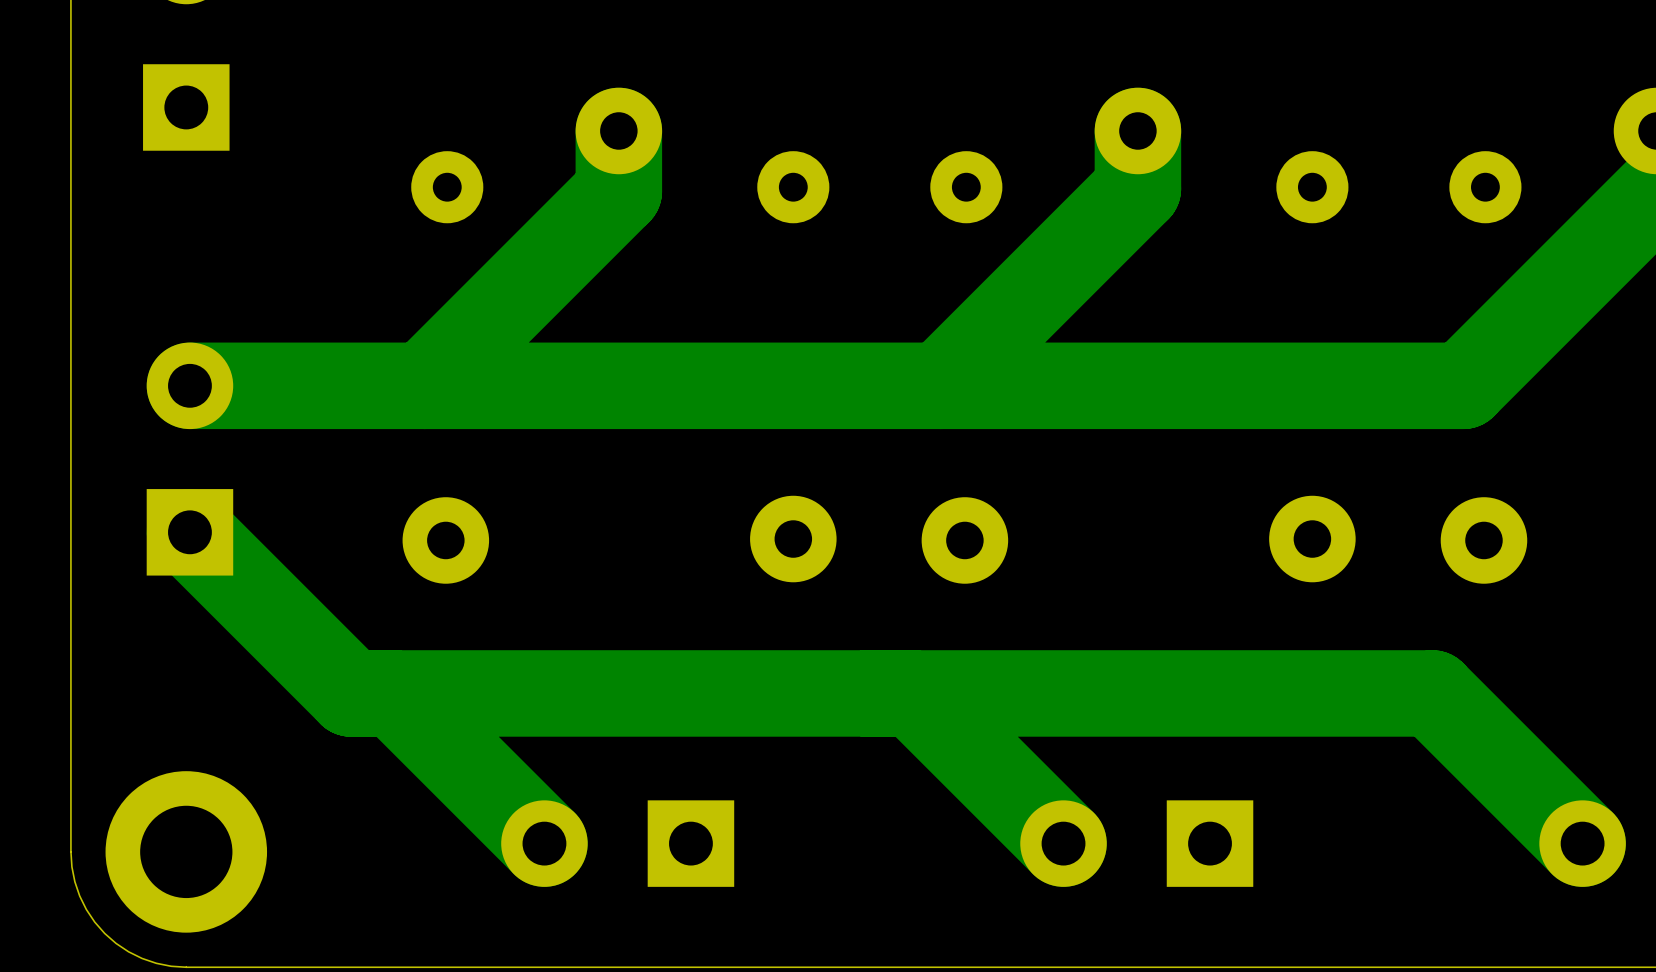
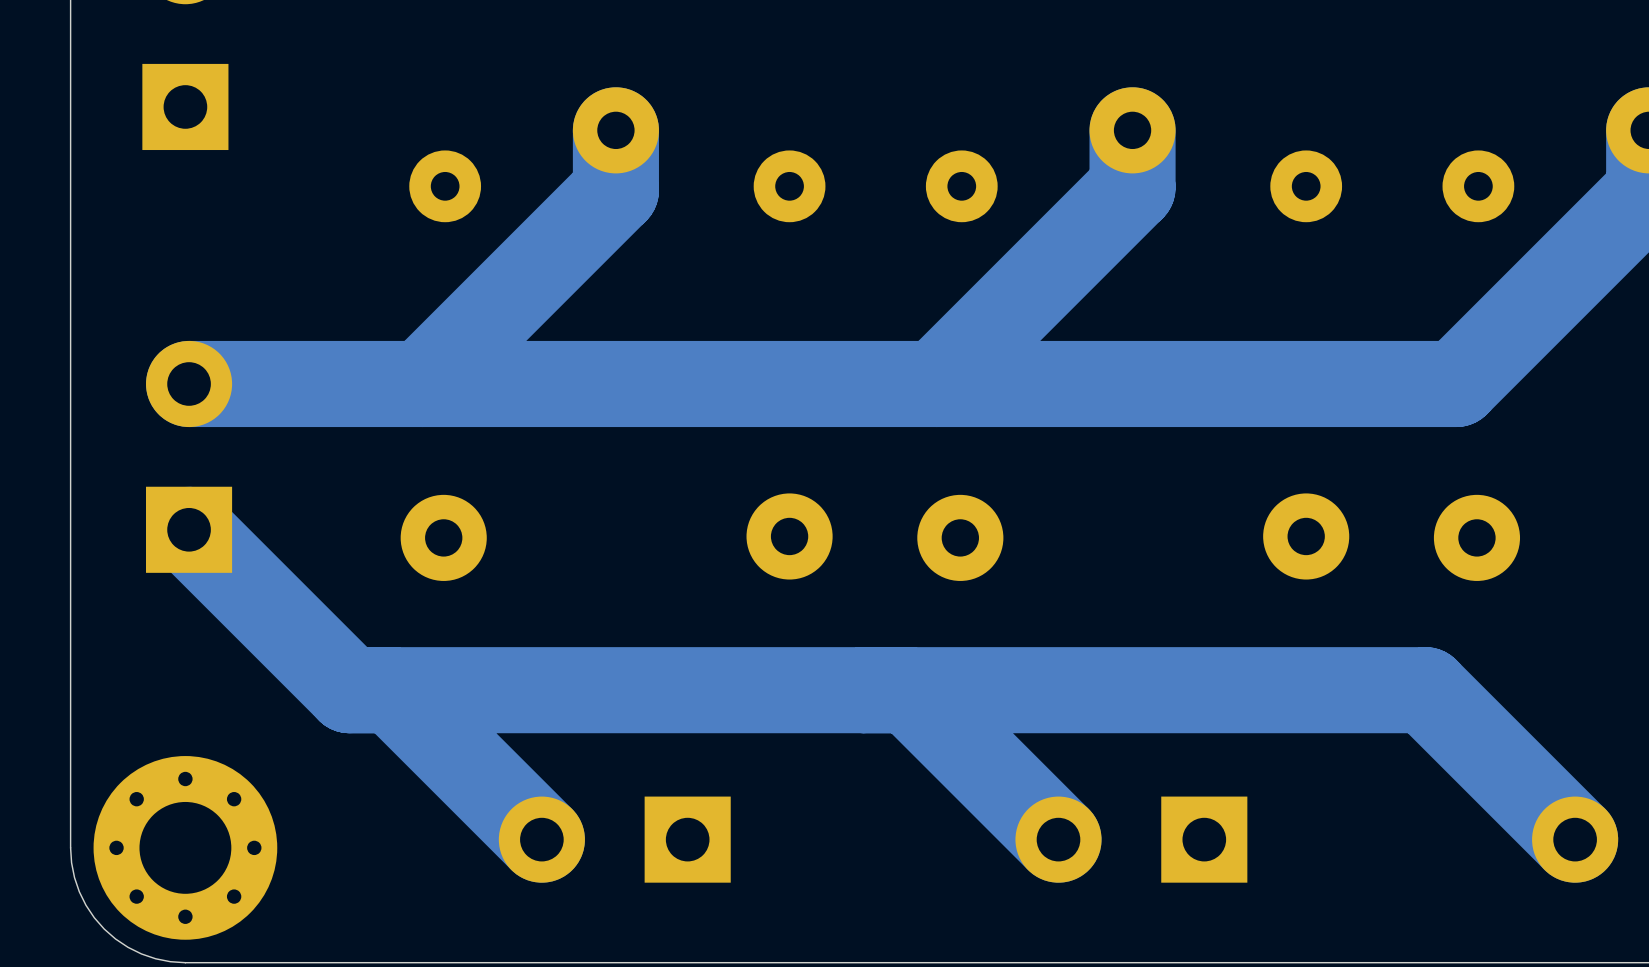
part footprint: [105, 771, 268, 933] -> [93, 756, 278, 940]

